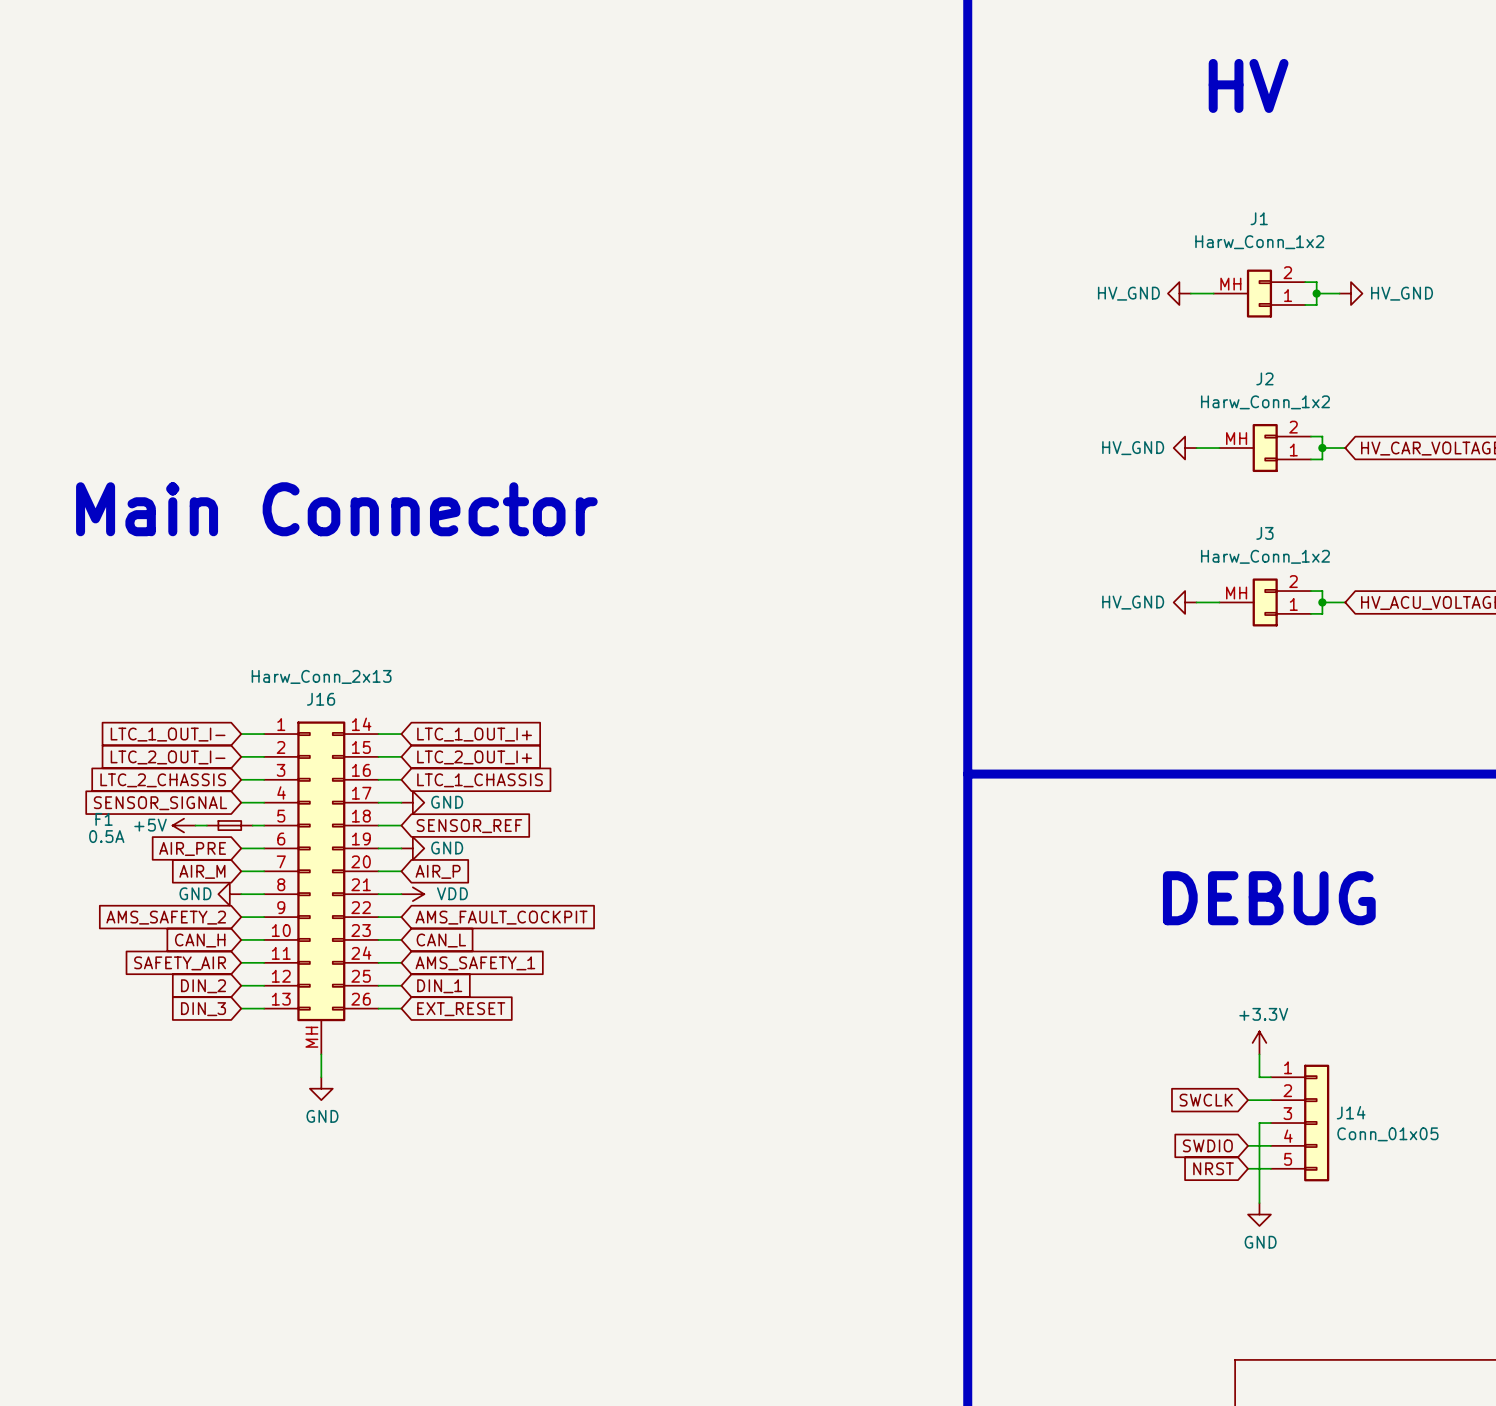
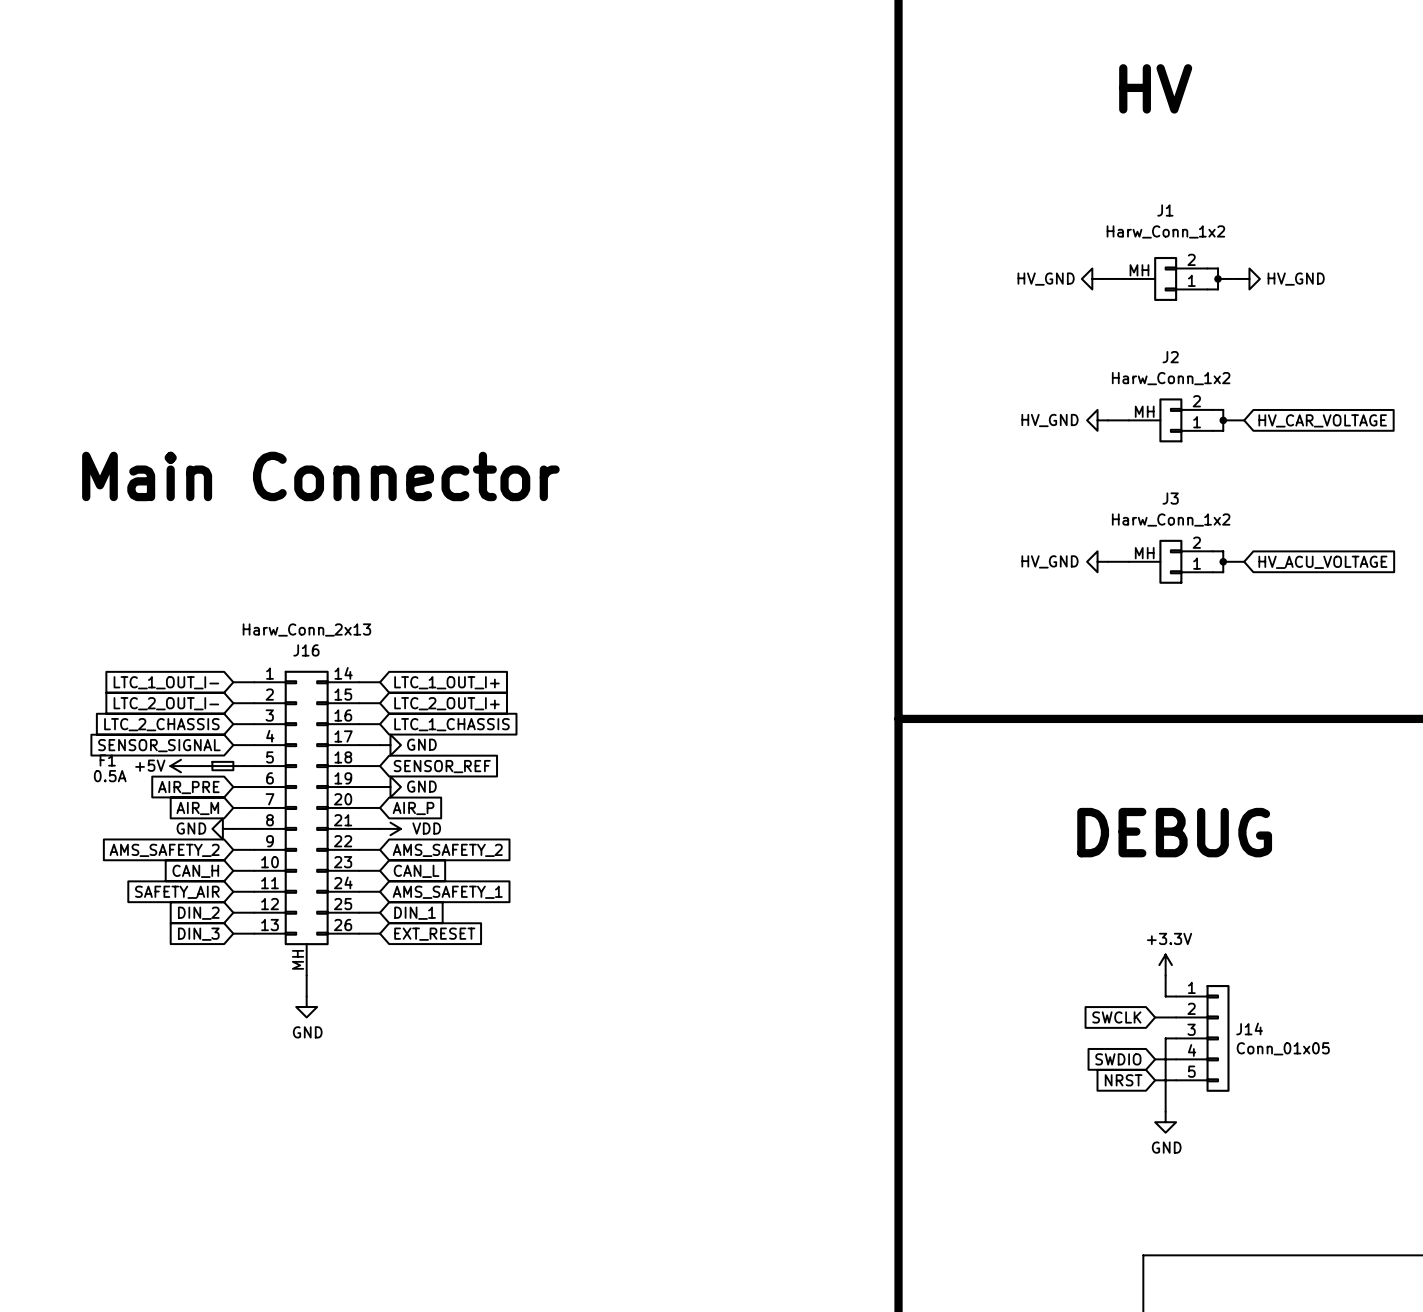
global label: AMS_FAULT_COCKPIT (501, 917) -> AMS_SAFETY_2 (447, 850)

